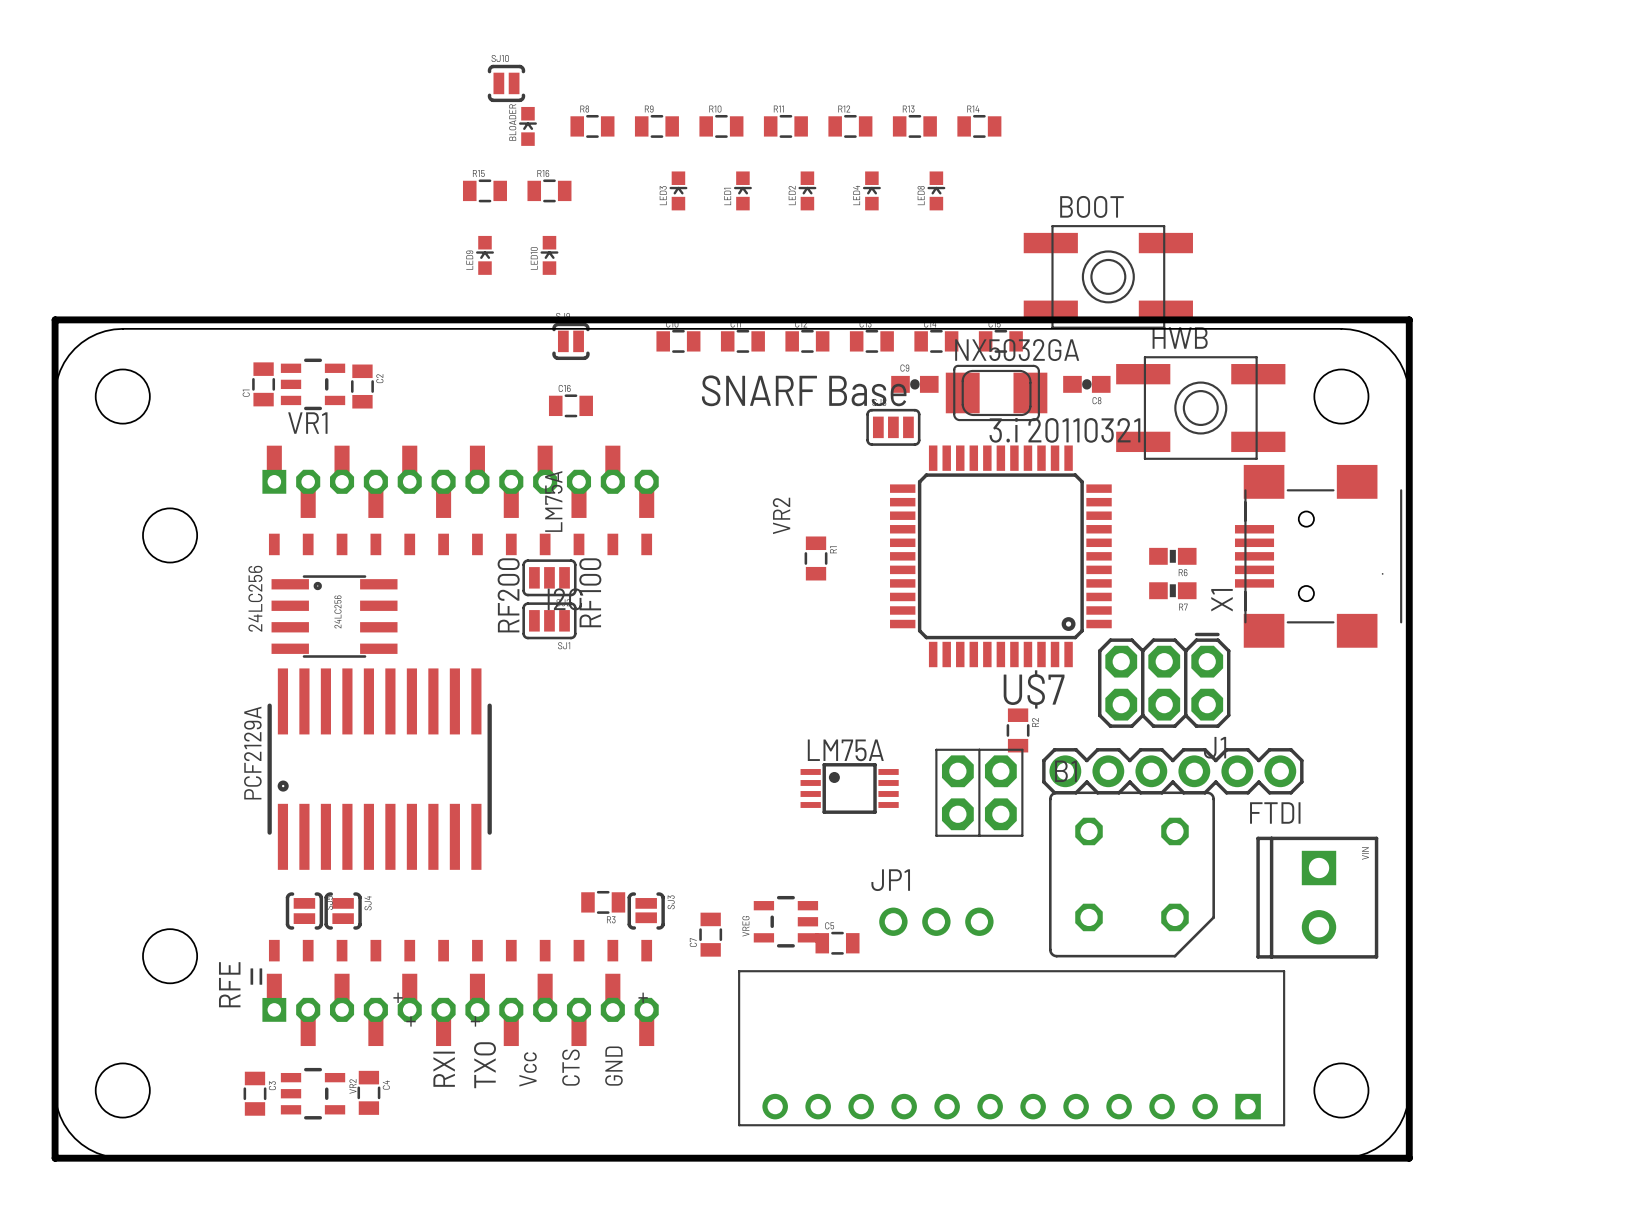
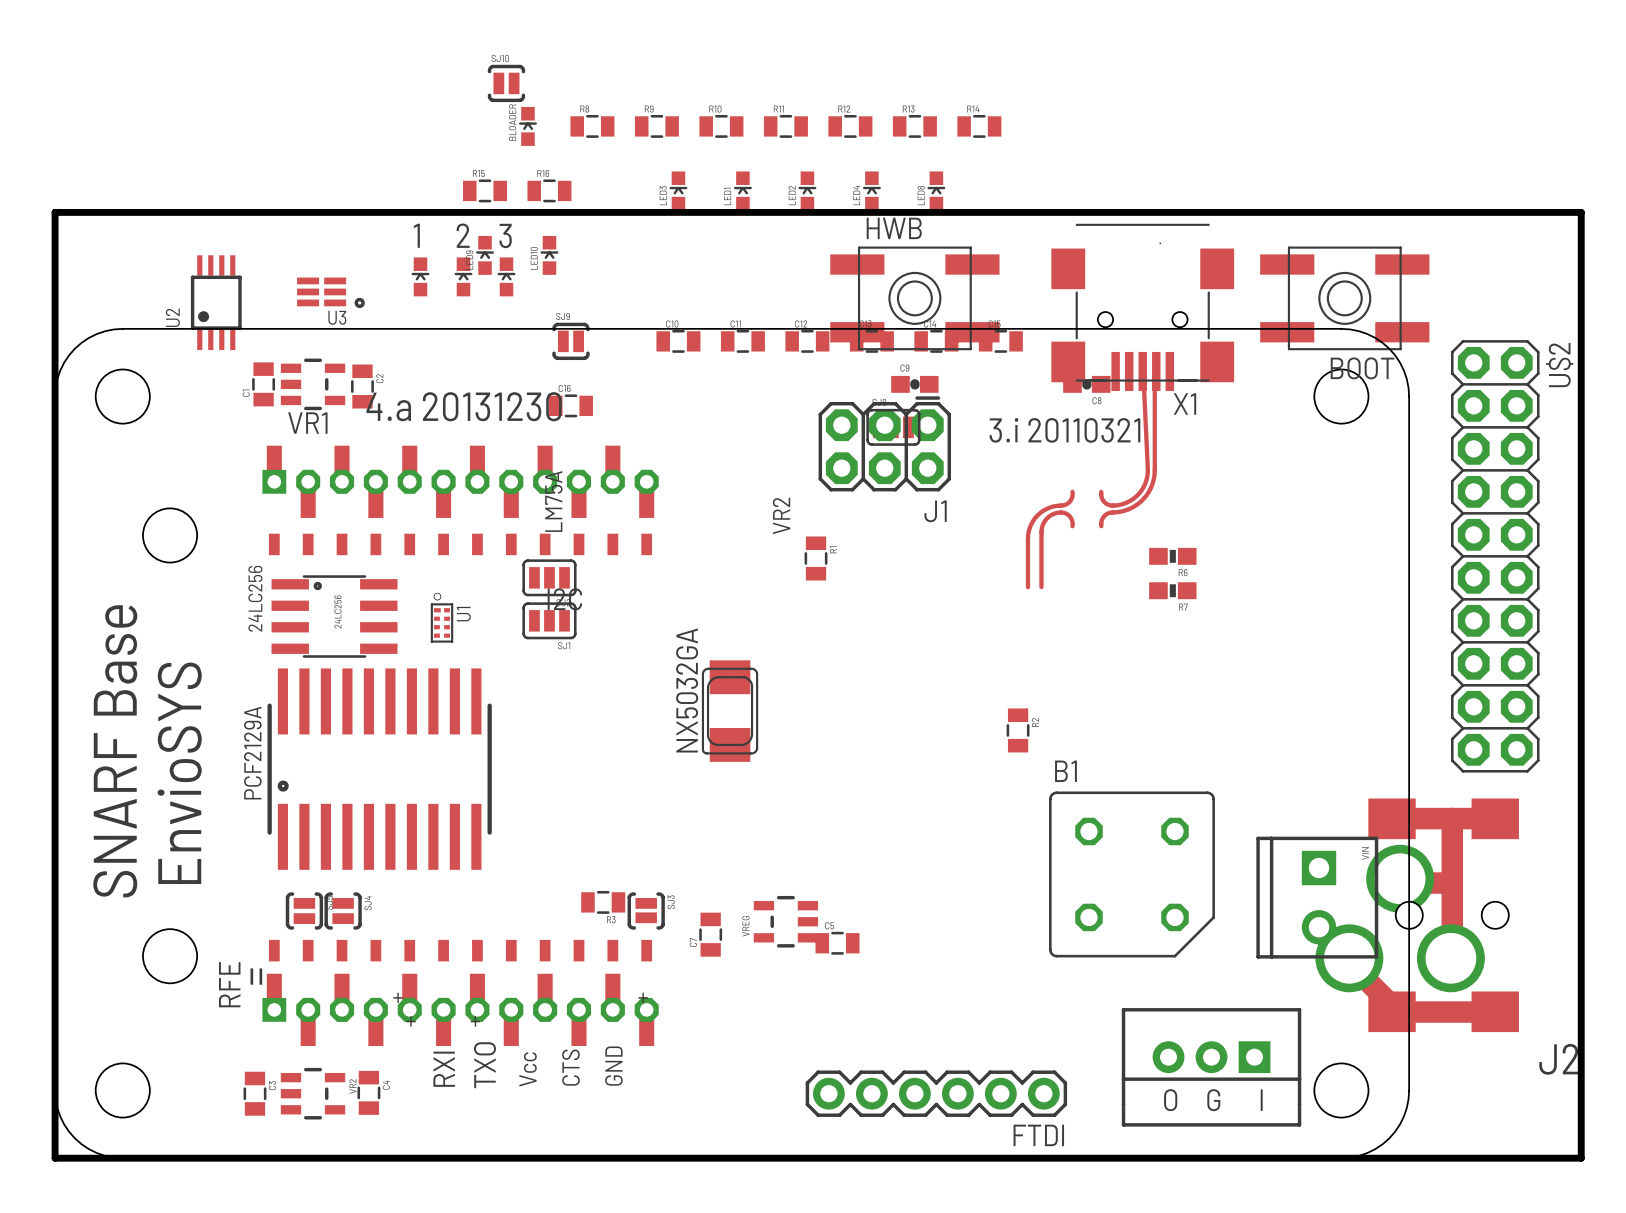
BOOT name position: BOOT (1091, 206) -> BOOT (1362, 368)
1: none -> (420, 276)
2: none -> (463, 276)
3: none -> (506, 276)
BOOT position: (1108, 276) -> (1344, 298)
U3: none -> (330, 292)
U2: none -> (216, 302)
board edge: (55, 319) (1409, 319) (1409, 1158) -> (55, 319) (55, 212) (1581, 212) (1581, 1158) (1409, 1158)
track: none -> (1142, 371) (1144, 374) (1147, 470) (1145, 483) (1134, 498) (1117, 505) (1105, 503) (1102, 498) (1101, 491)
track: none -> (1156, 371) (1154, 470) (1151, 486) (1146, 496) (1133, 506) (1105, 514) (1102, 519) (1101, 526)
text: SNARF Base (804, 390) -> none
NX5032GA rotation: 0° (996, 392) -> 90° counterclockwise (730, 711)
NX5032GA position: (996, 392) -> (730, 711)
text: none -> 4.a 20131230 (464, 406)
HWB position: (1200, 408) -> (914, 298)
track: none -> (1072, 491) (1071, 498) (1067, 503) (1044, 510) (1034, 518) (1030, 526) (1027, 538) (1027, 587)
track: none -> (1072, 526) (1069, 516) (1062, 512) (1051, 515) (1044, 522) (1041, 532) (1041, 587)
U$7: (1000, 556) -> none
X1 rotation: 0° (1318, 556) -> 90° counterclockwise (1142, 307)
X1 position: (1318, 556) -> (1142, 307)
U$2: none -> (1495, 556)
text: RF100 (590, 592) -> none
text: RF200 (508, 595) -> none
U1: none -> (441, 617)
J1 position: (1164, 680) -> (884, 443)
text: none -> SNARF Base (115, 751)
FTDI position: (1172, 771) -> (936, 1093)
text: none -> EnvioSYS (179, 773)
LM75A: (849, 788) -> none
part: (979, 792) -> none
J2: none -> (1417, 915)
JP1: (936, 921) -> none
part: (1011, 1048) -> none
part: none -> (1211, 1067)

